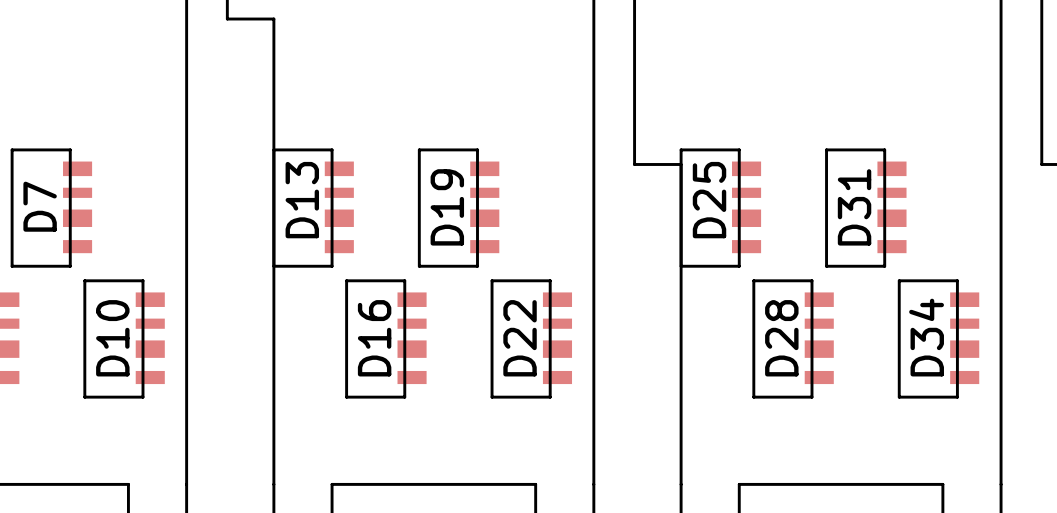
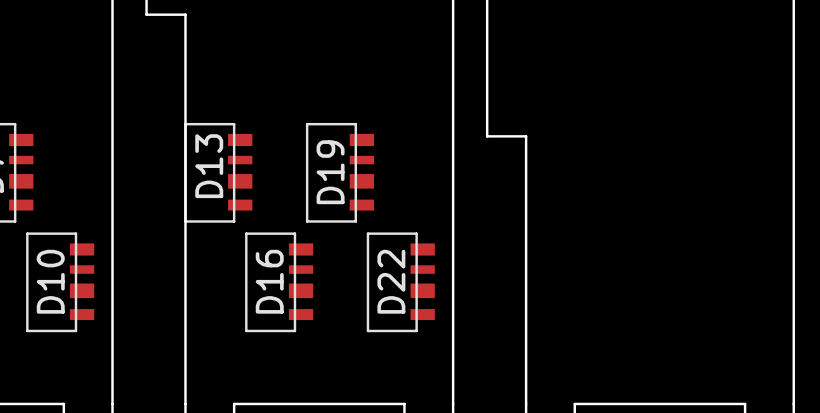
D25: (720, 208) -> none
D31: (865, 208) -> none
D28: (793, 338) -> none
D34: (938, 338) -> none

